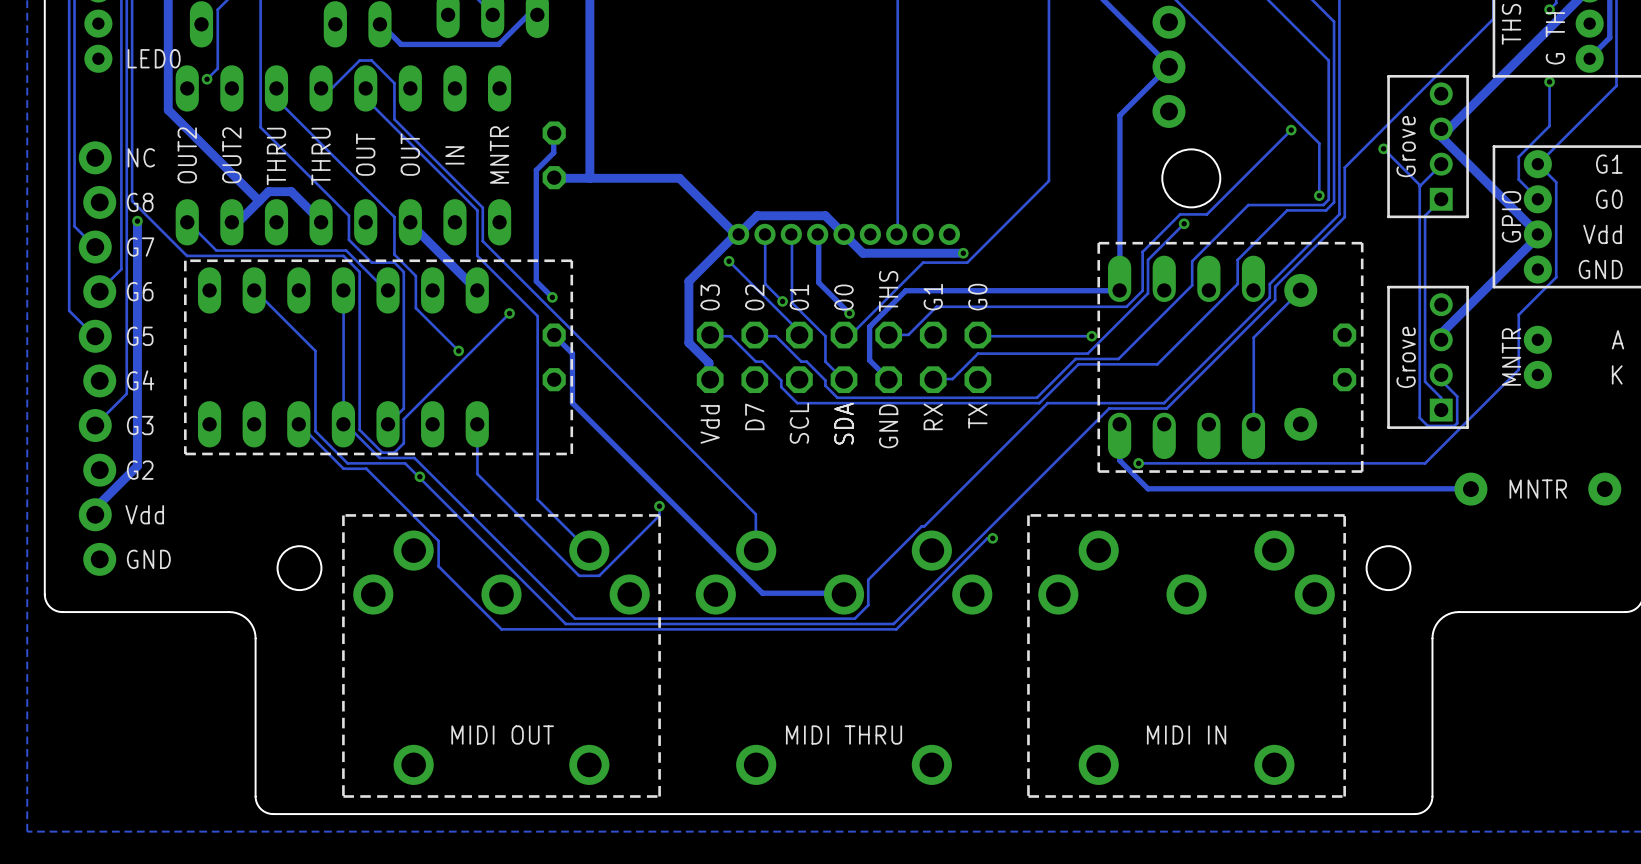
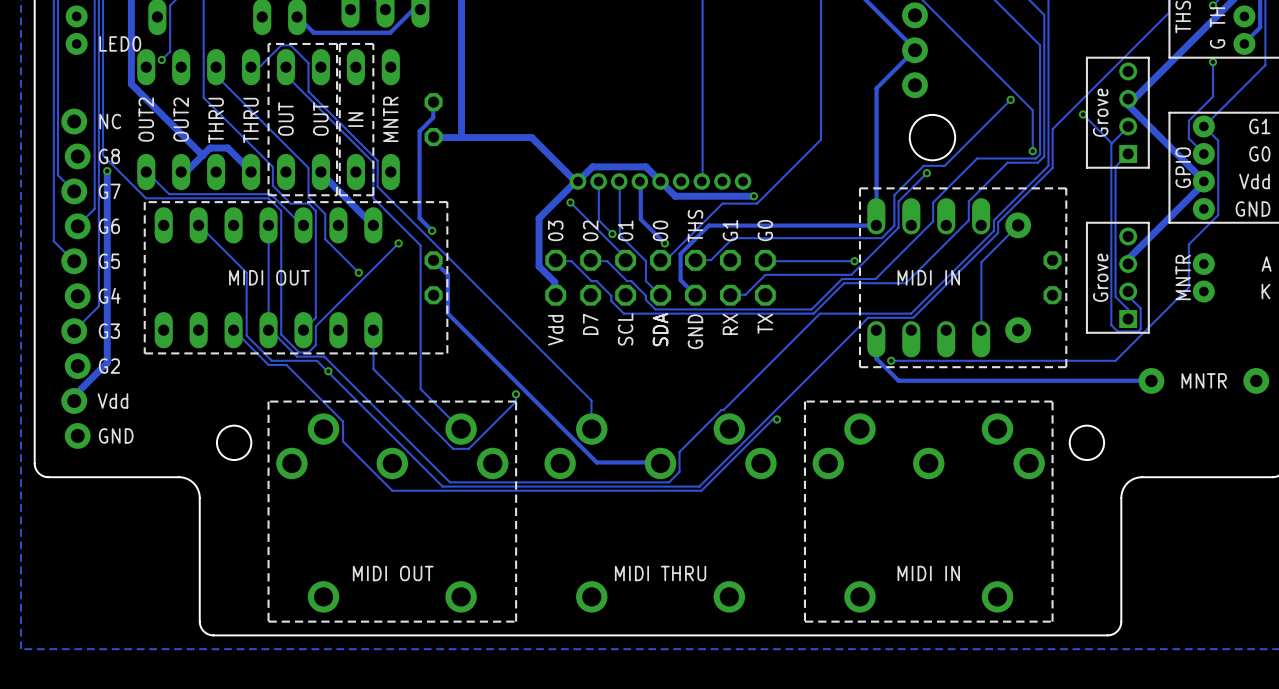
line: none -> (337, 43) (337, 195) (268, 195) (268, 43) (337, 43)
line: none -> (373, 43) (339, 43) (339, 195) (373, 195) (373, 43)
text: none -> MIDI OUT (269, 277)
text: none -> MIDI IN (928, 277)

